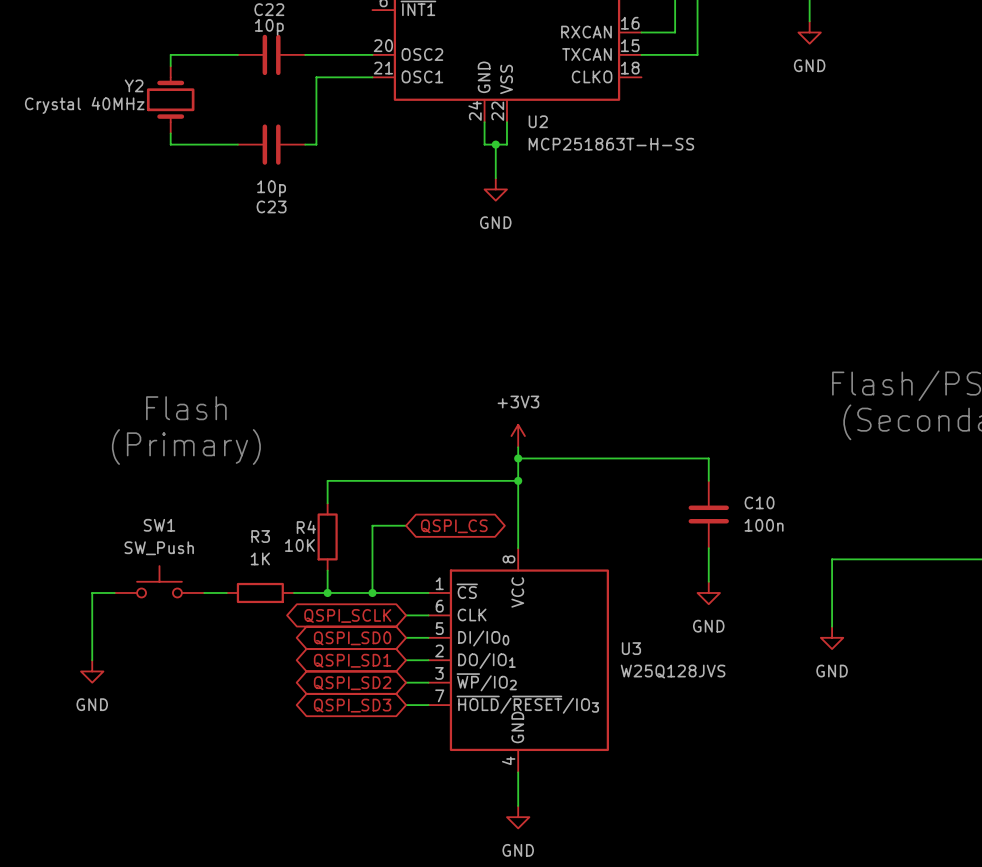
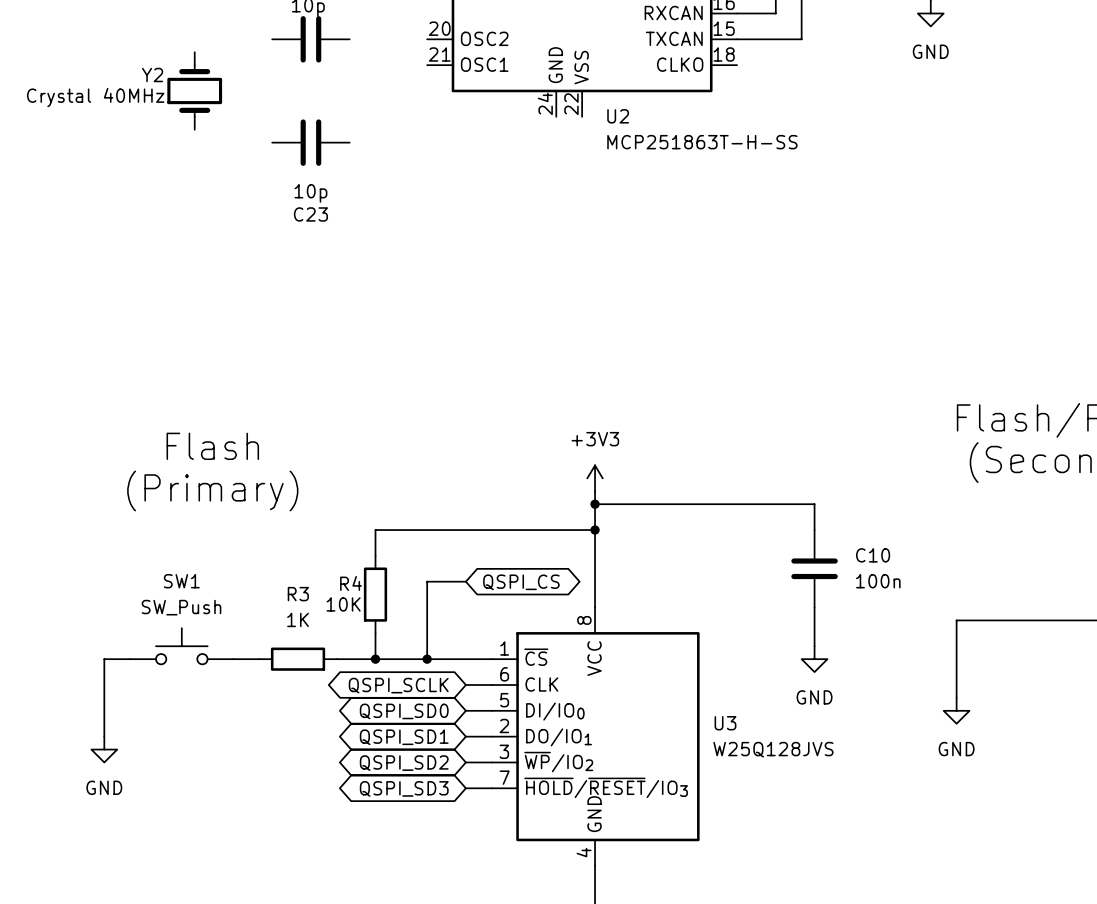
wire: (237, 54) (170, 54) (170, 66) -> none
wire: (305, 54) (372, 54) -> none
wire: (372, 77) (316, 77) (316, 144) (305, 144) -> none
wire: (484, 122) (484, 144) (506, 144) (506, 122) -> none
wire: (170, 133) (170, 144) (237, 144) -> none
wire: (495, 144) (495, 178) -> none
junction: (495, 144) -> none
power symbol: GND (495, 189) -> none

